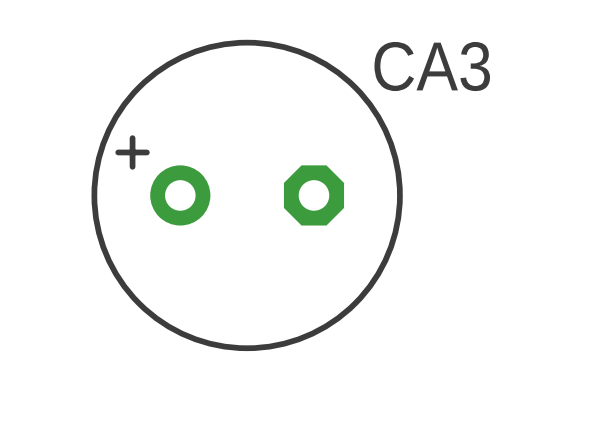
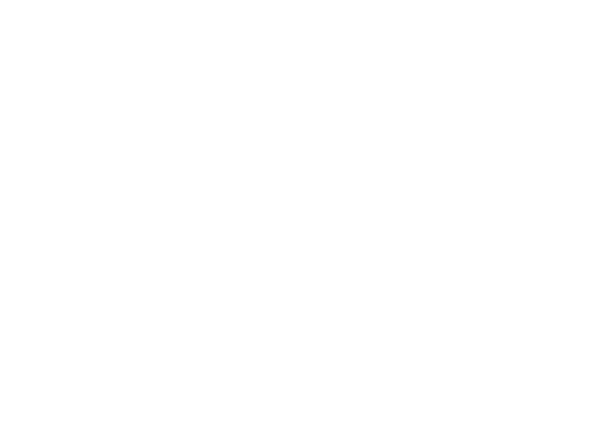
CA3: (247, 195) -> none

